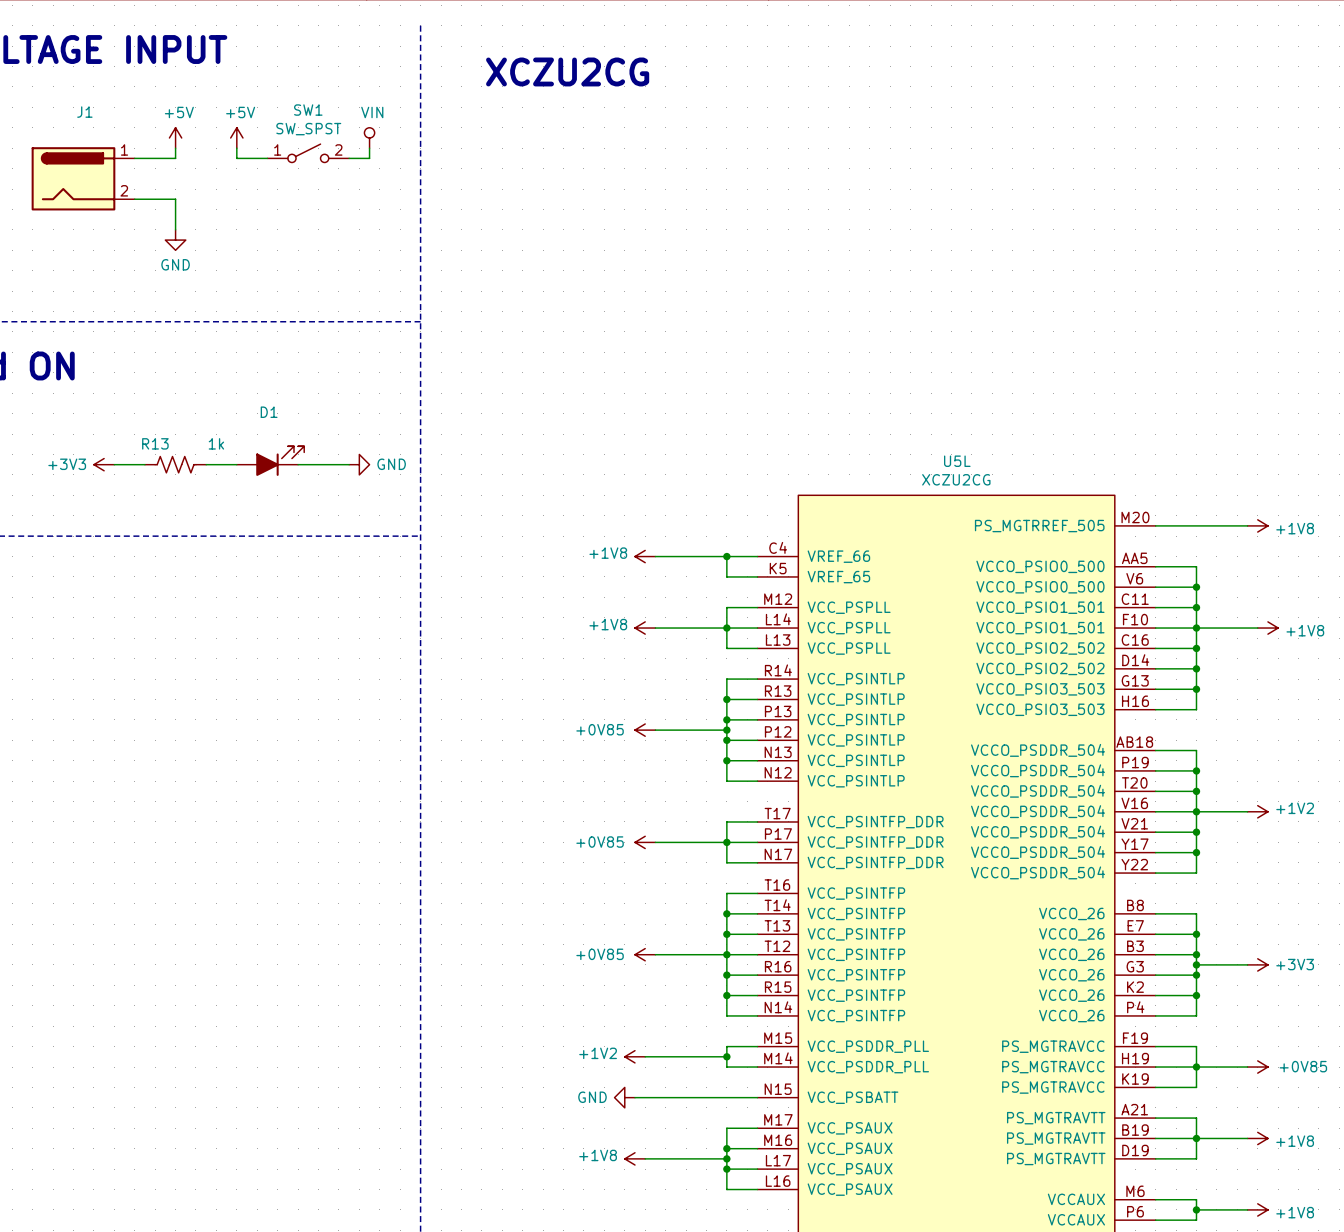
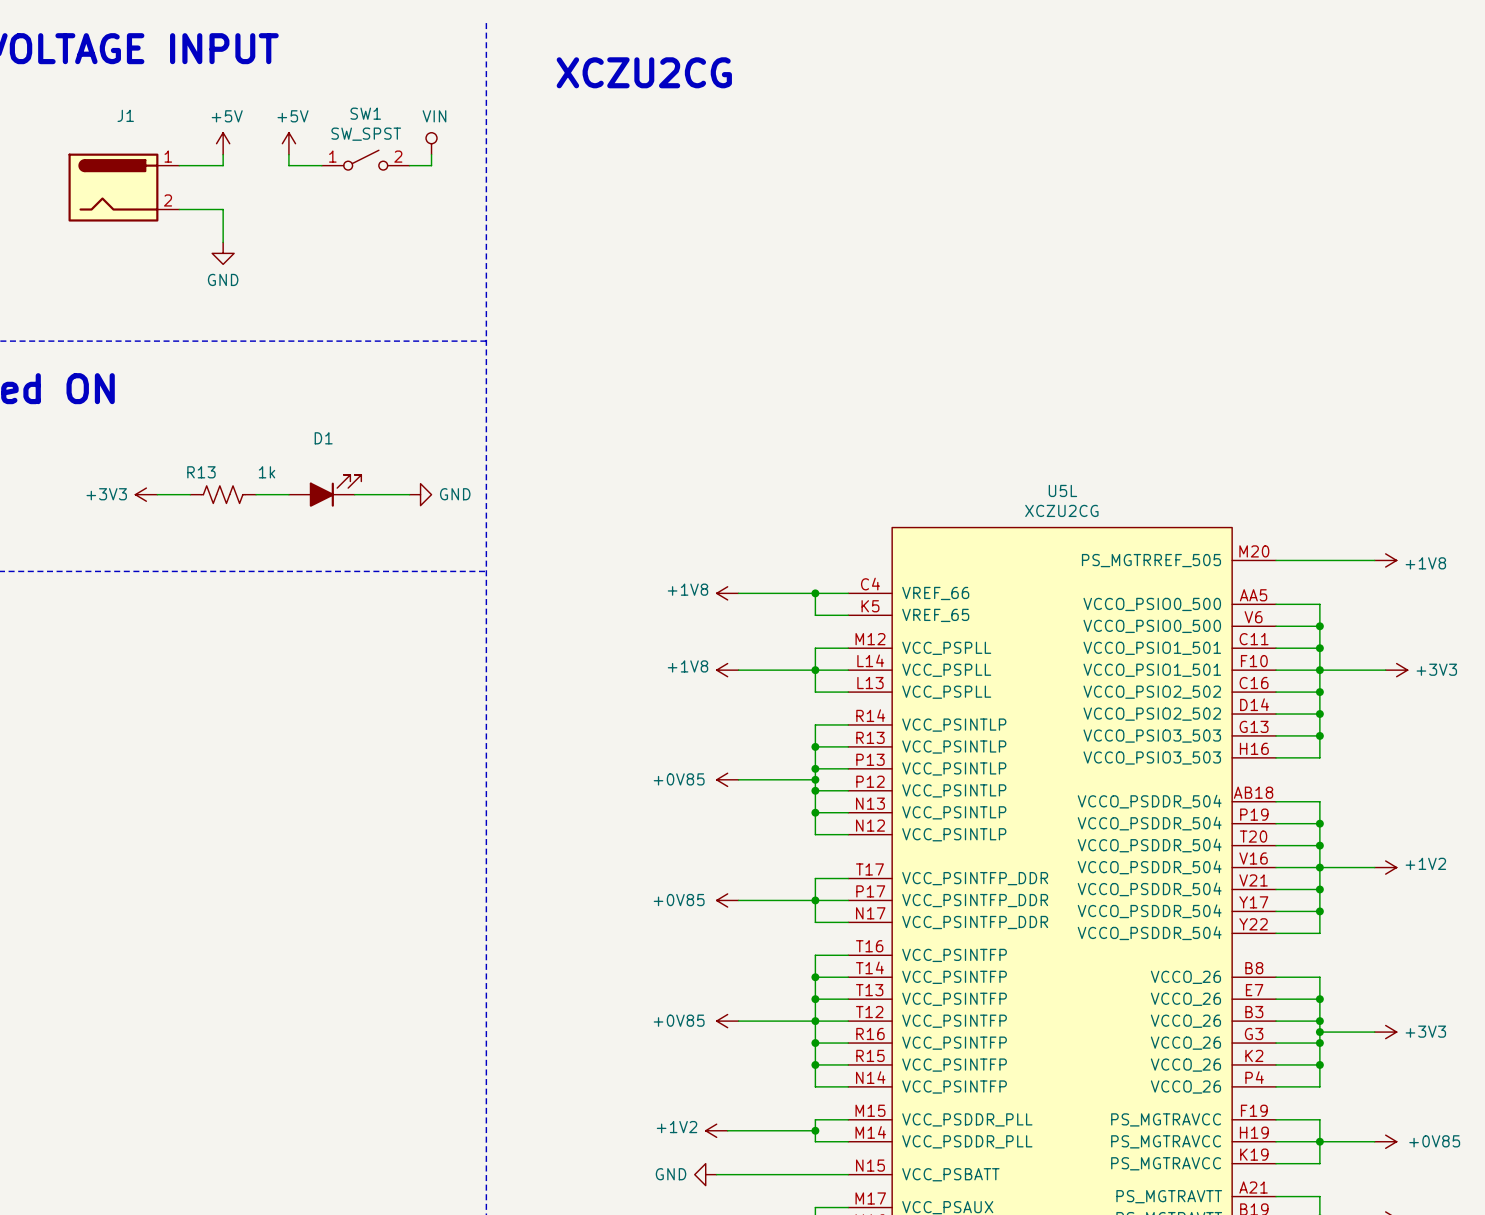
power symbol: +1V8 (1267, 628) -> +3V3 (1396, 670)

